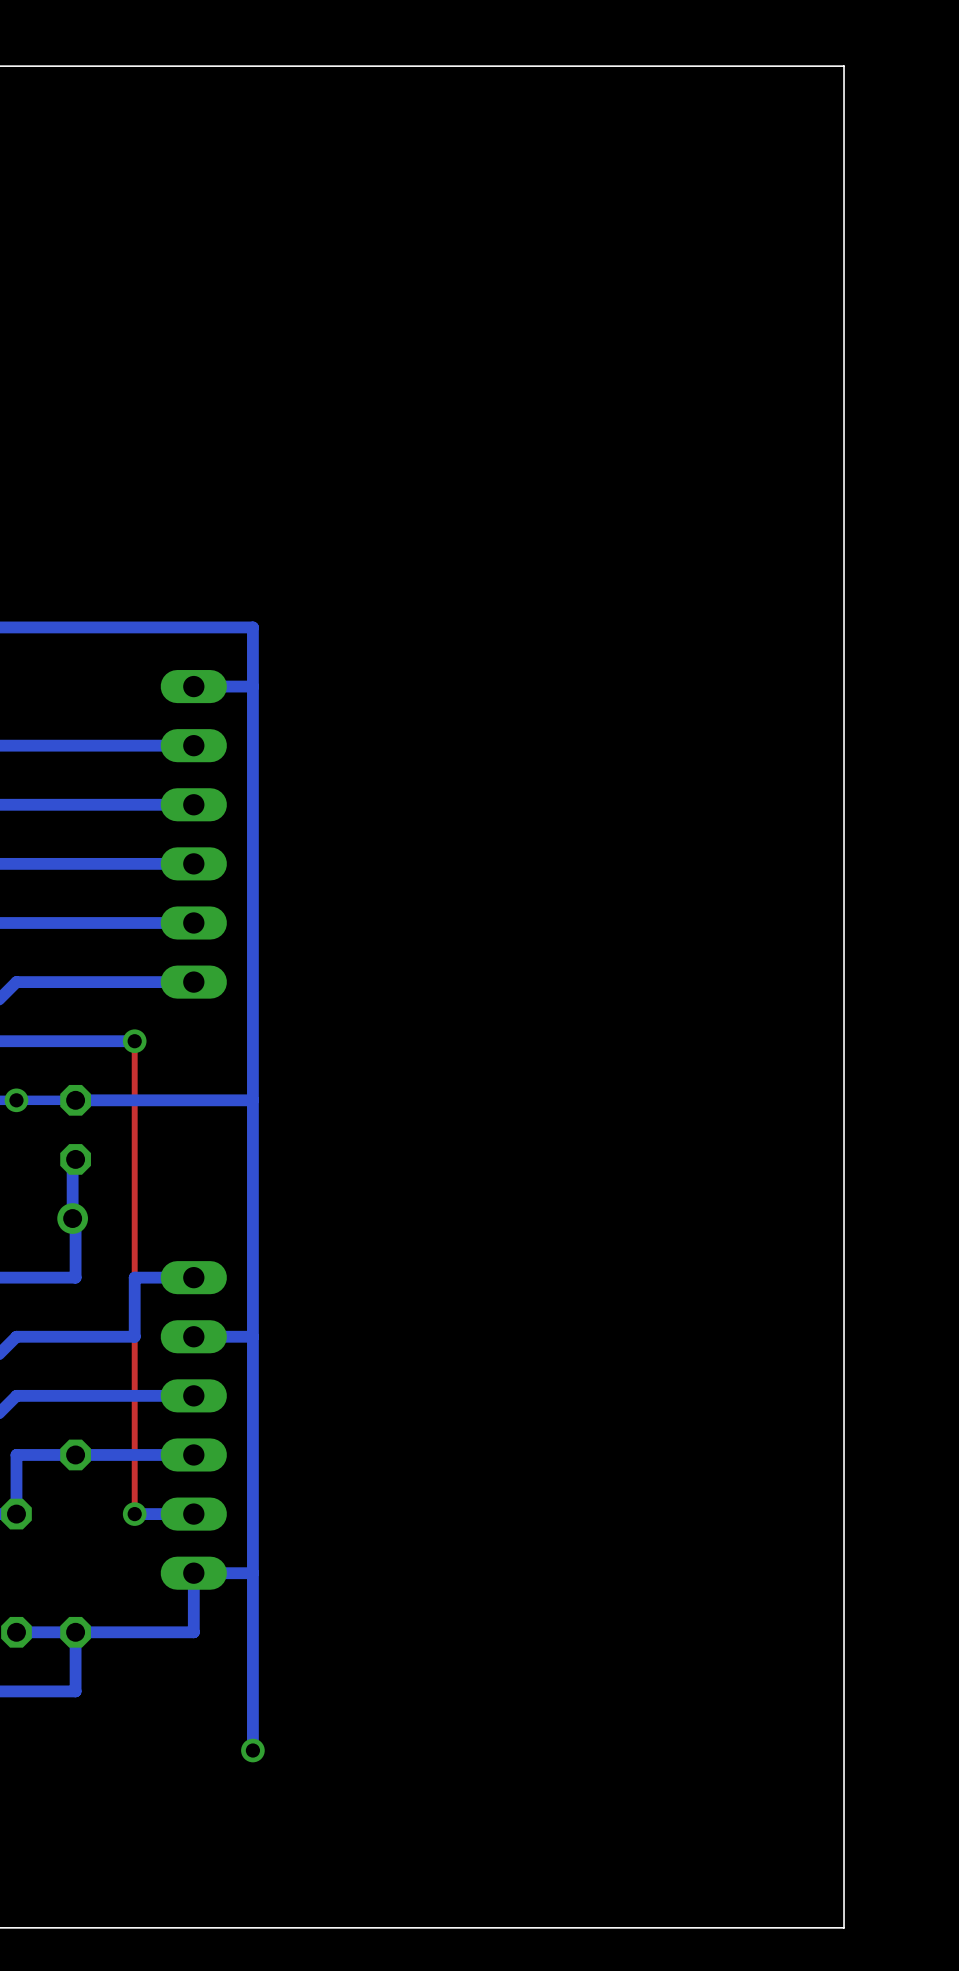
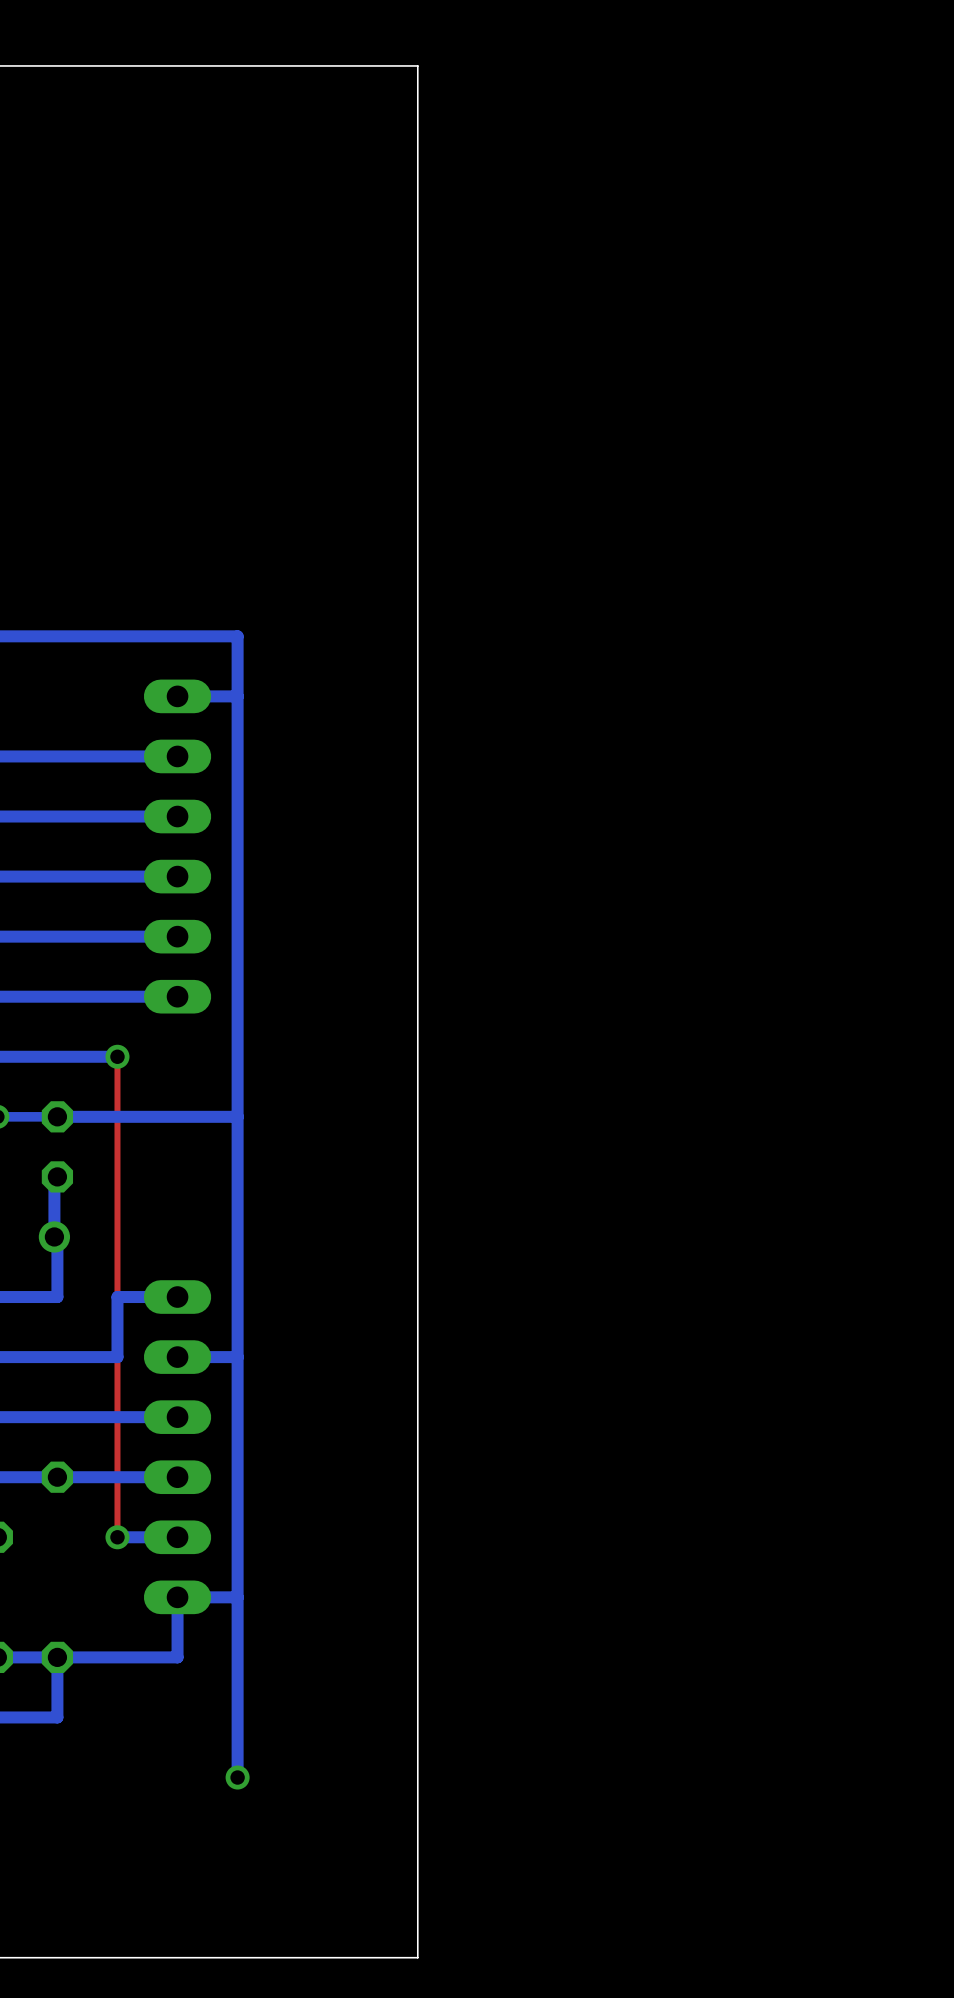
board edge: (430, 66) (844, 66) (844, 1927) (430, 1927) -> (417, 65) (417, 1957)

